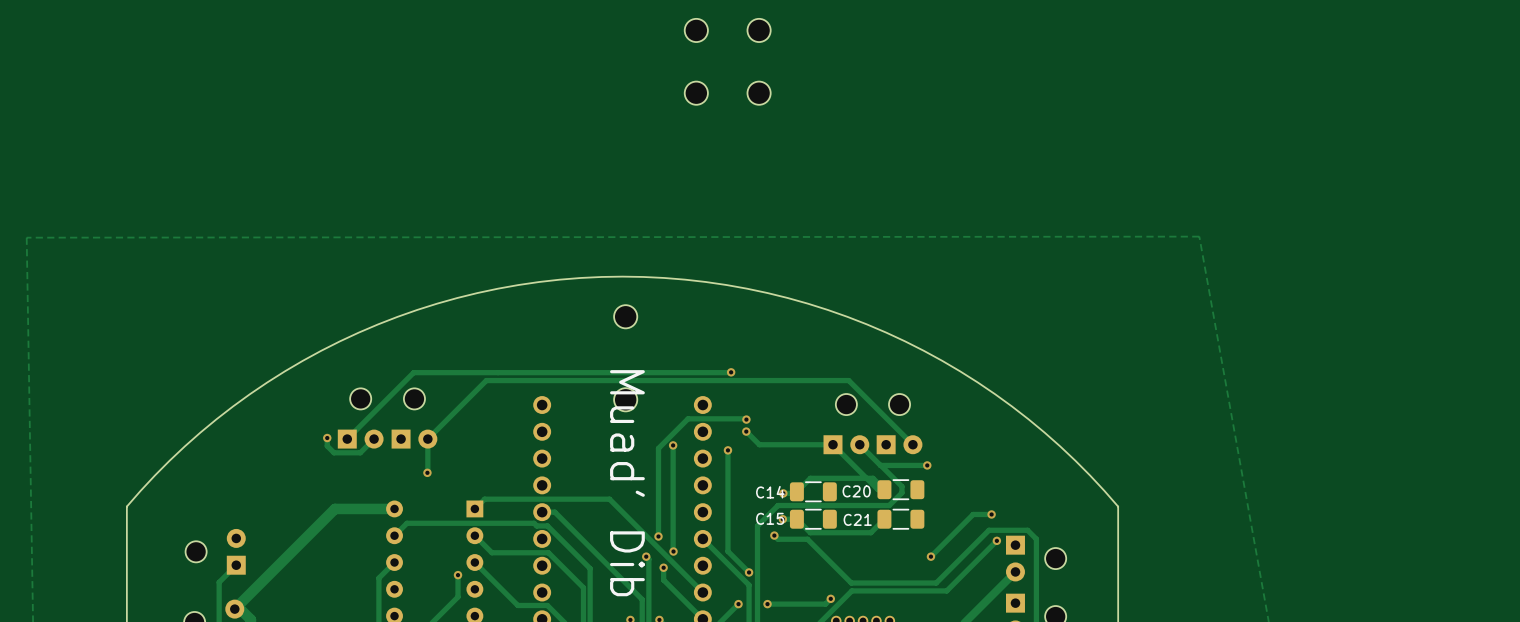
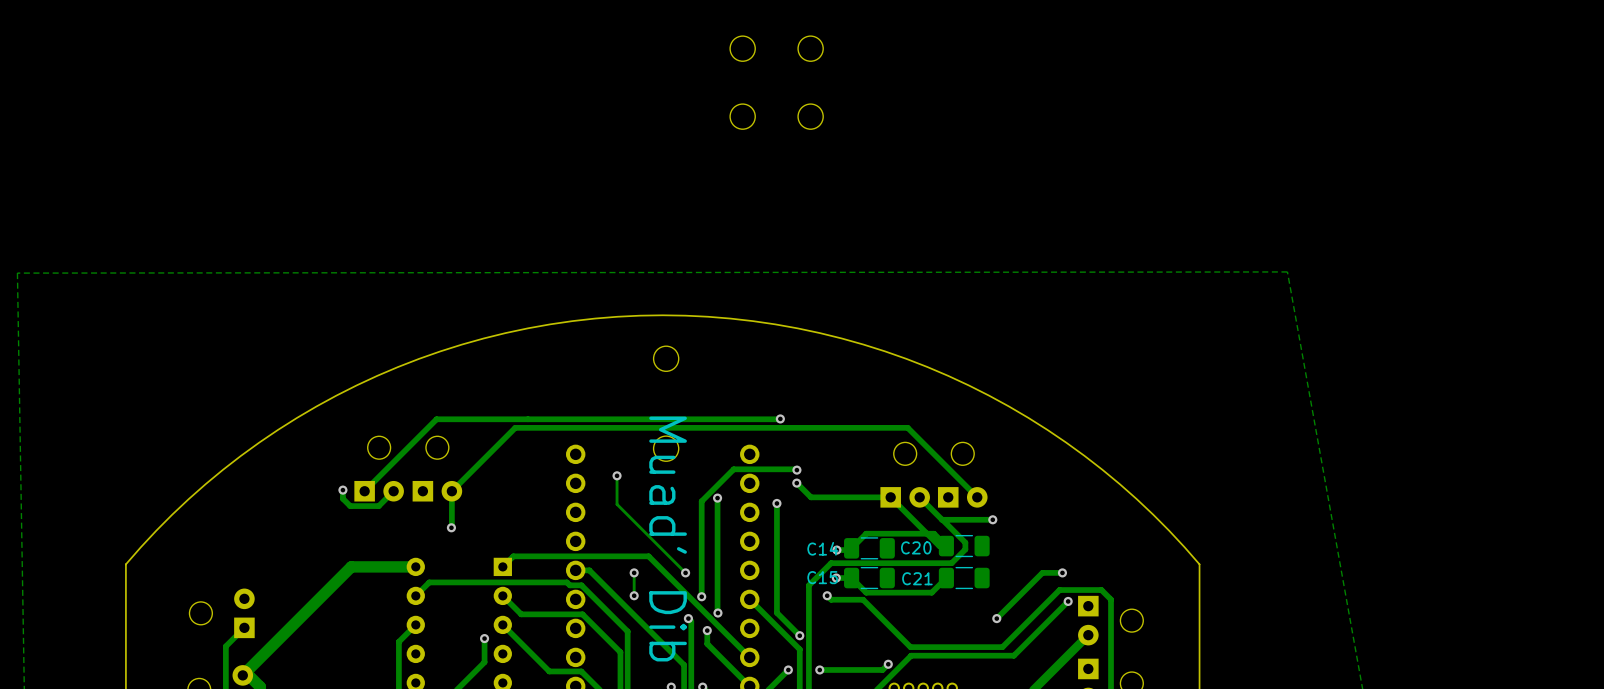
track: none -> (617, 475) (617, 504) (685, 572)
via: none -> (617, 475)
track: none -> (634, 572) (634, 595)
via: none -> (634, 572)
via: none -> (685, 572)
via: none -> (634, 595)

